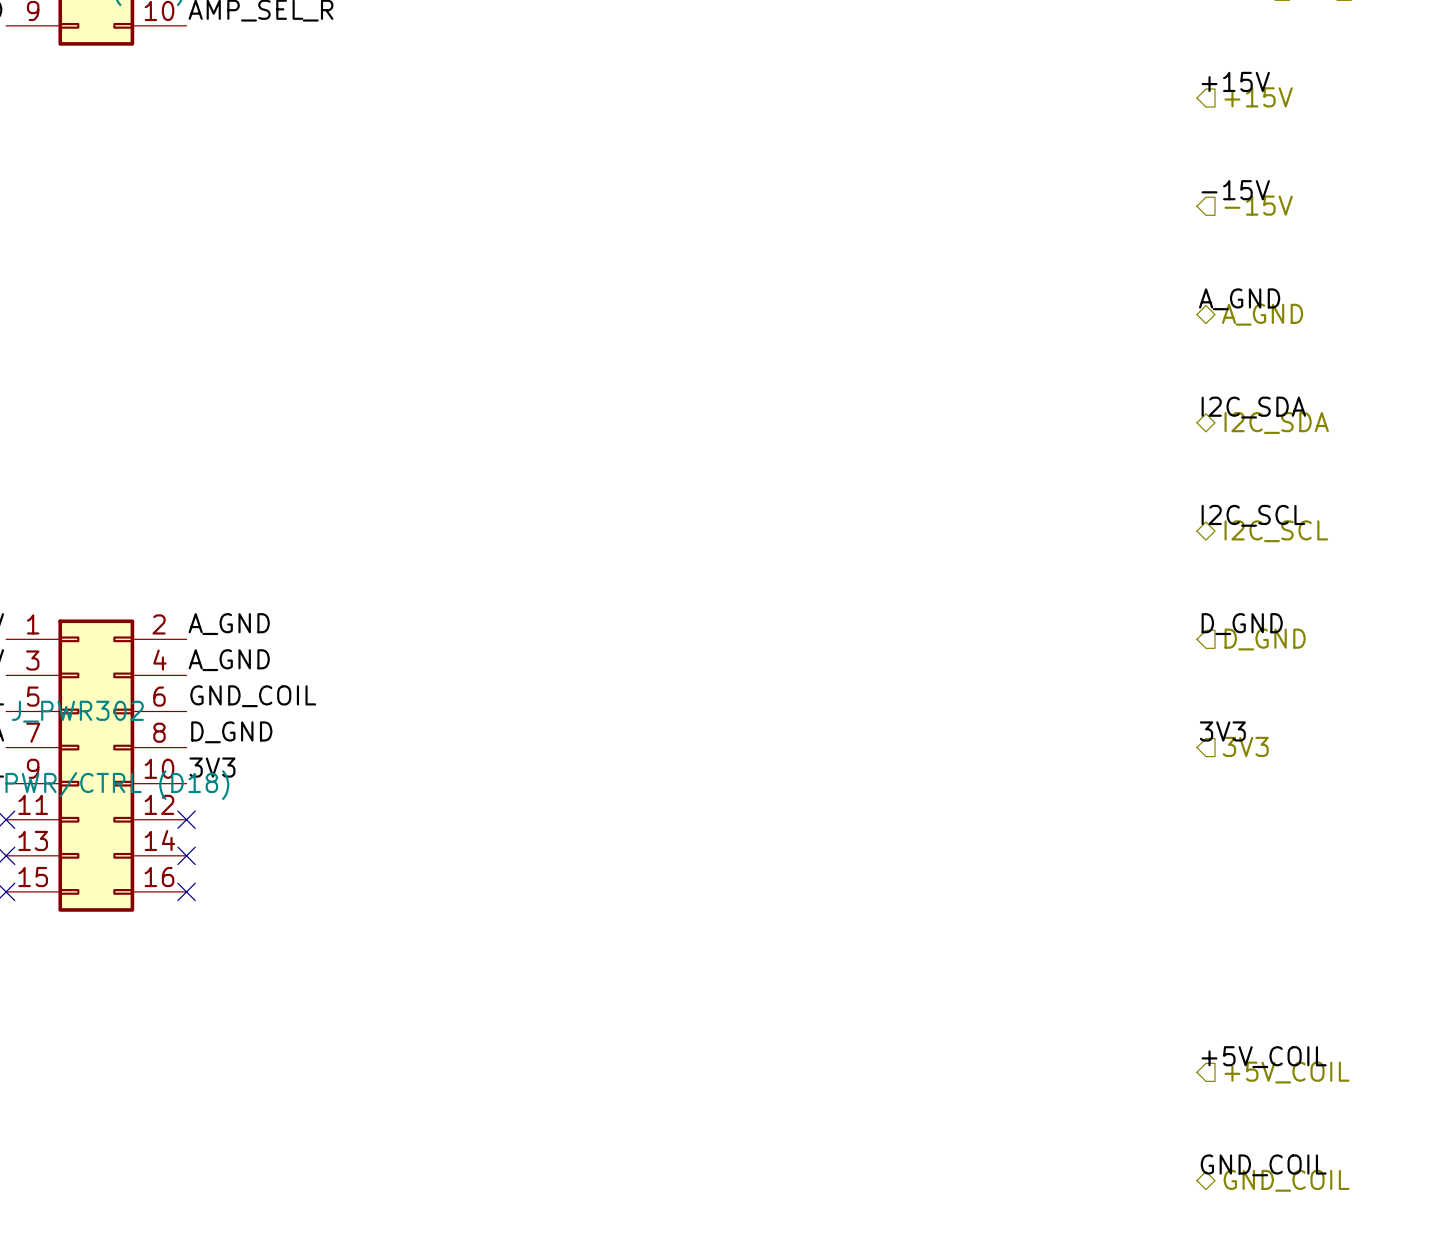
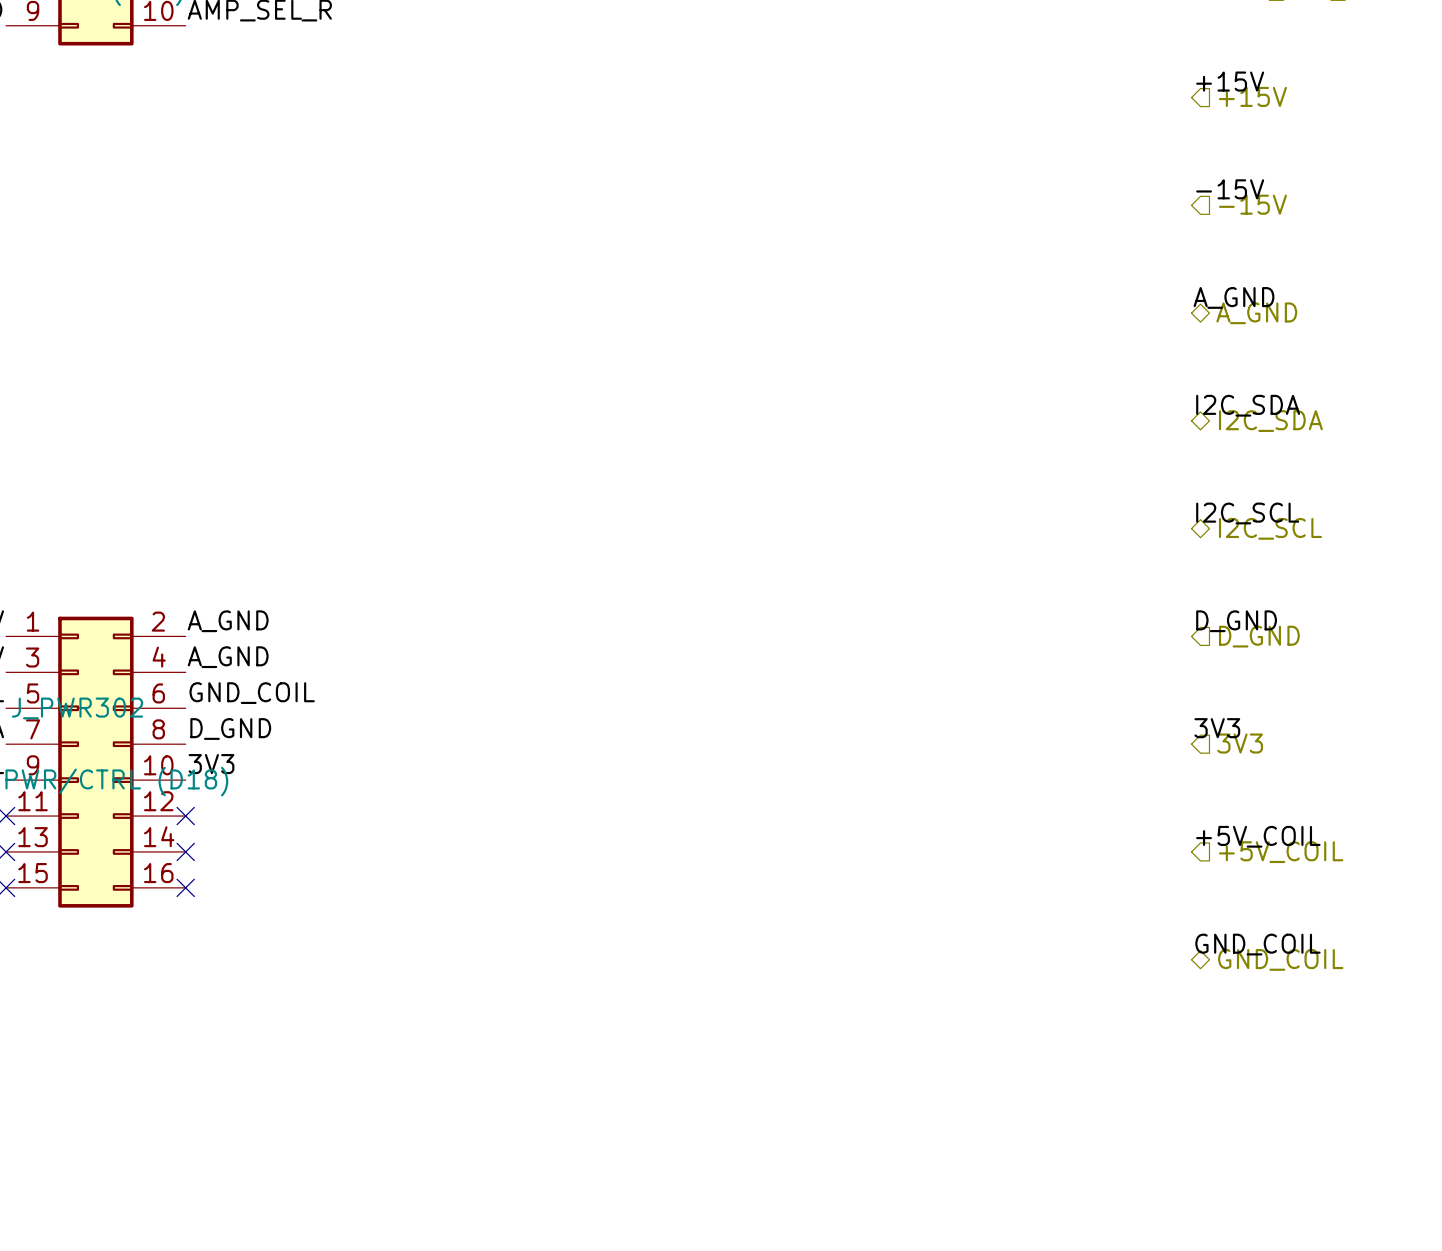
label position: +5V_COIL (1264, 1057) -> +5V_COIL (1258, 836)
hierarchical label position: +5V_COIL (1287, 1072) -> +5V_COIL (1281, 852)
label position: GND_COIL (1263, 1165) -> GND_COIL (1257, 944)
hierarchical label position: GND_COIL (1286, 1180) -> GND_COIL (1280, 959)

